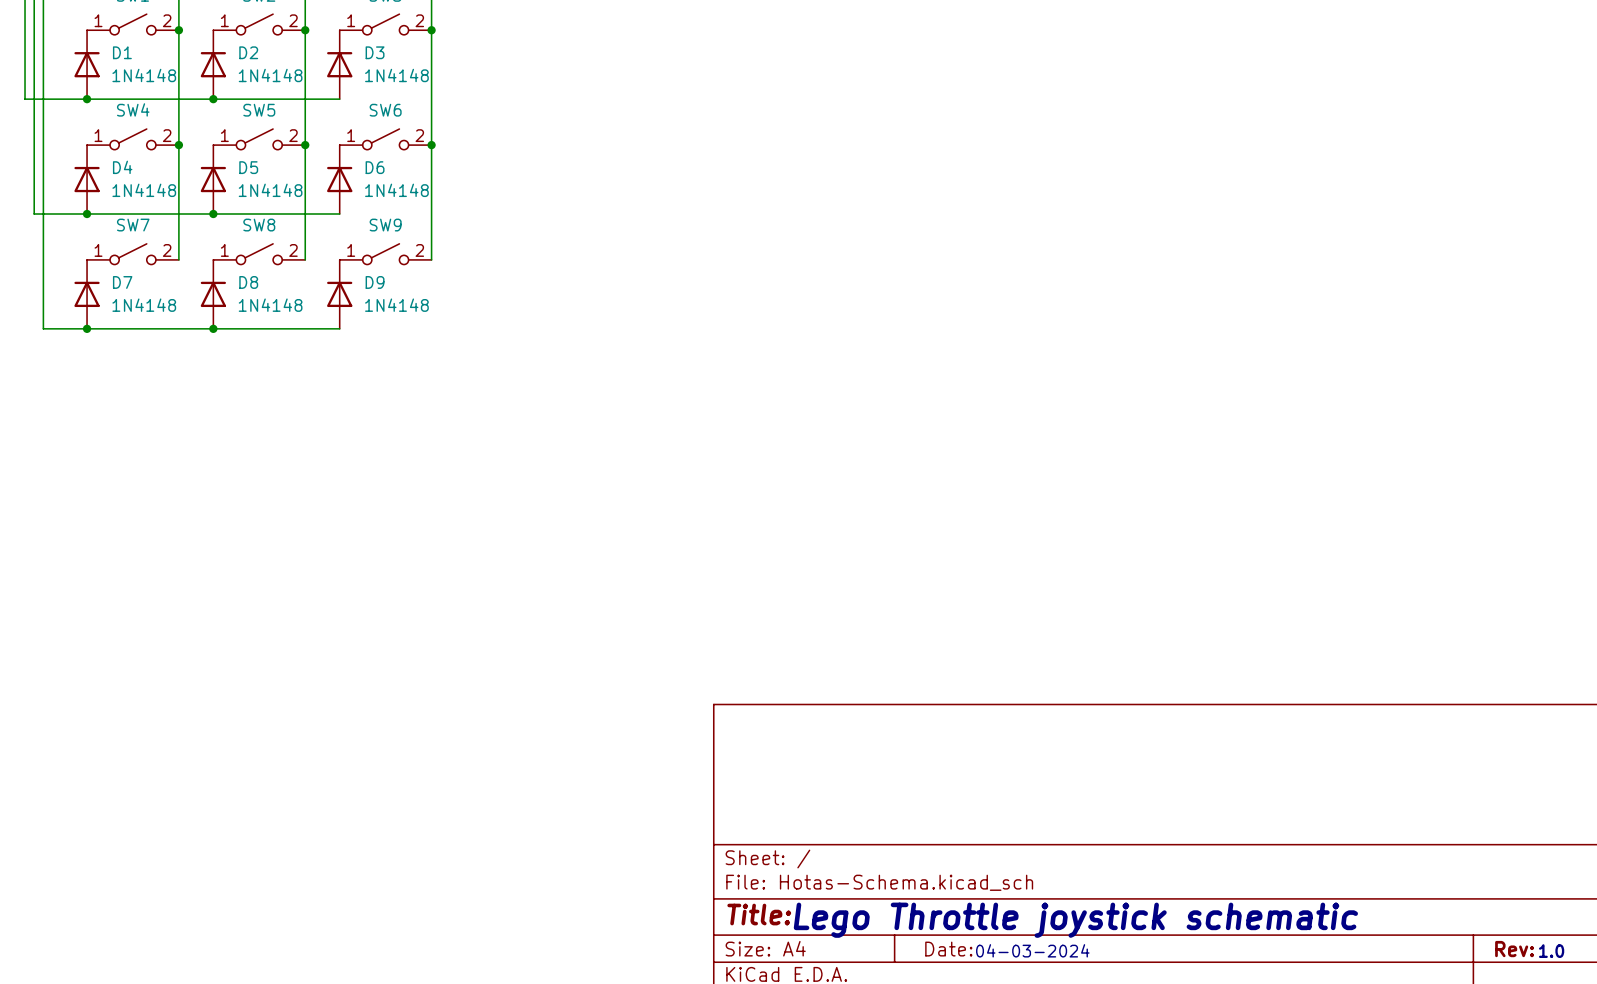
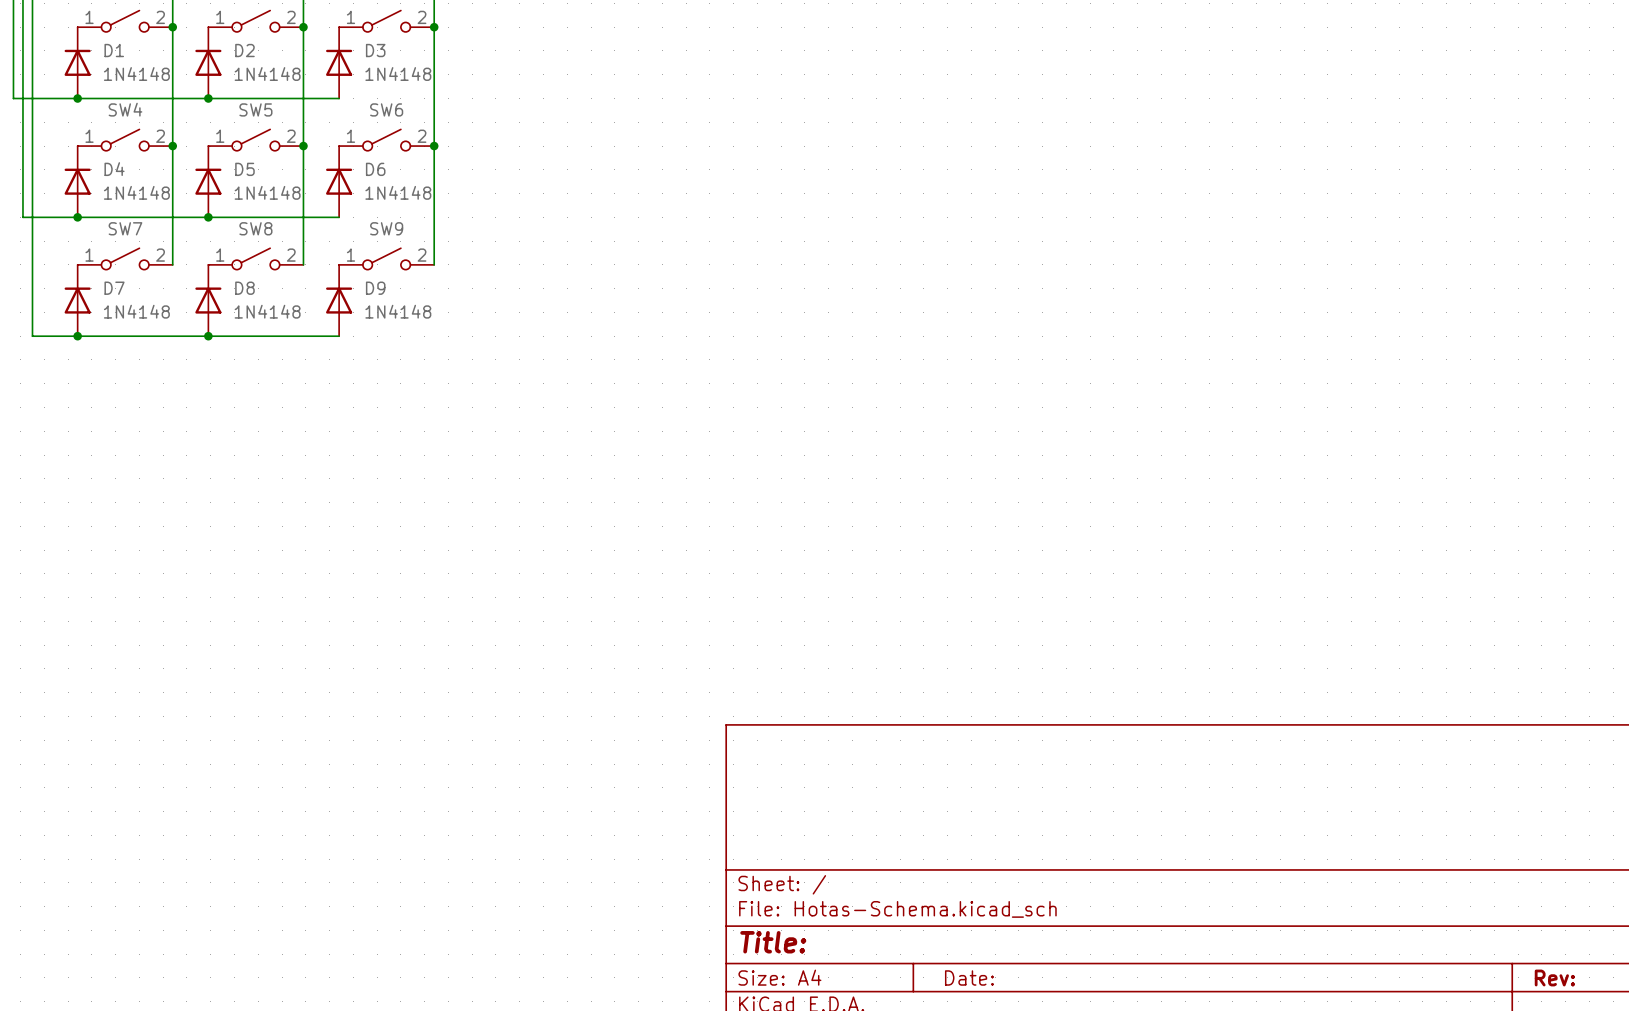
text: Lego Throttle joystick schematic (1075, 920) -> none
text: 04-03-2024 (1032, 950) -> none
text: 1.0 (1551, 951) -> none

